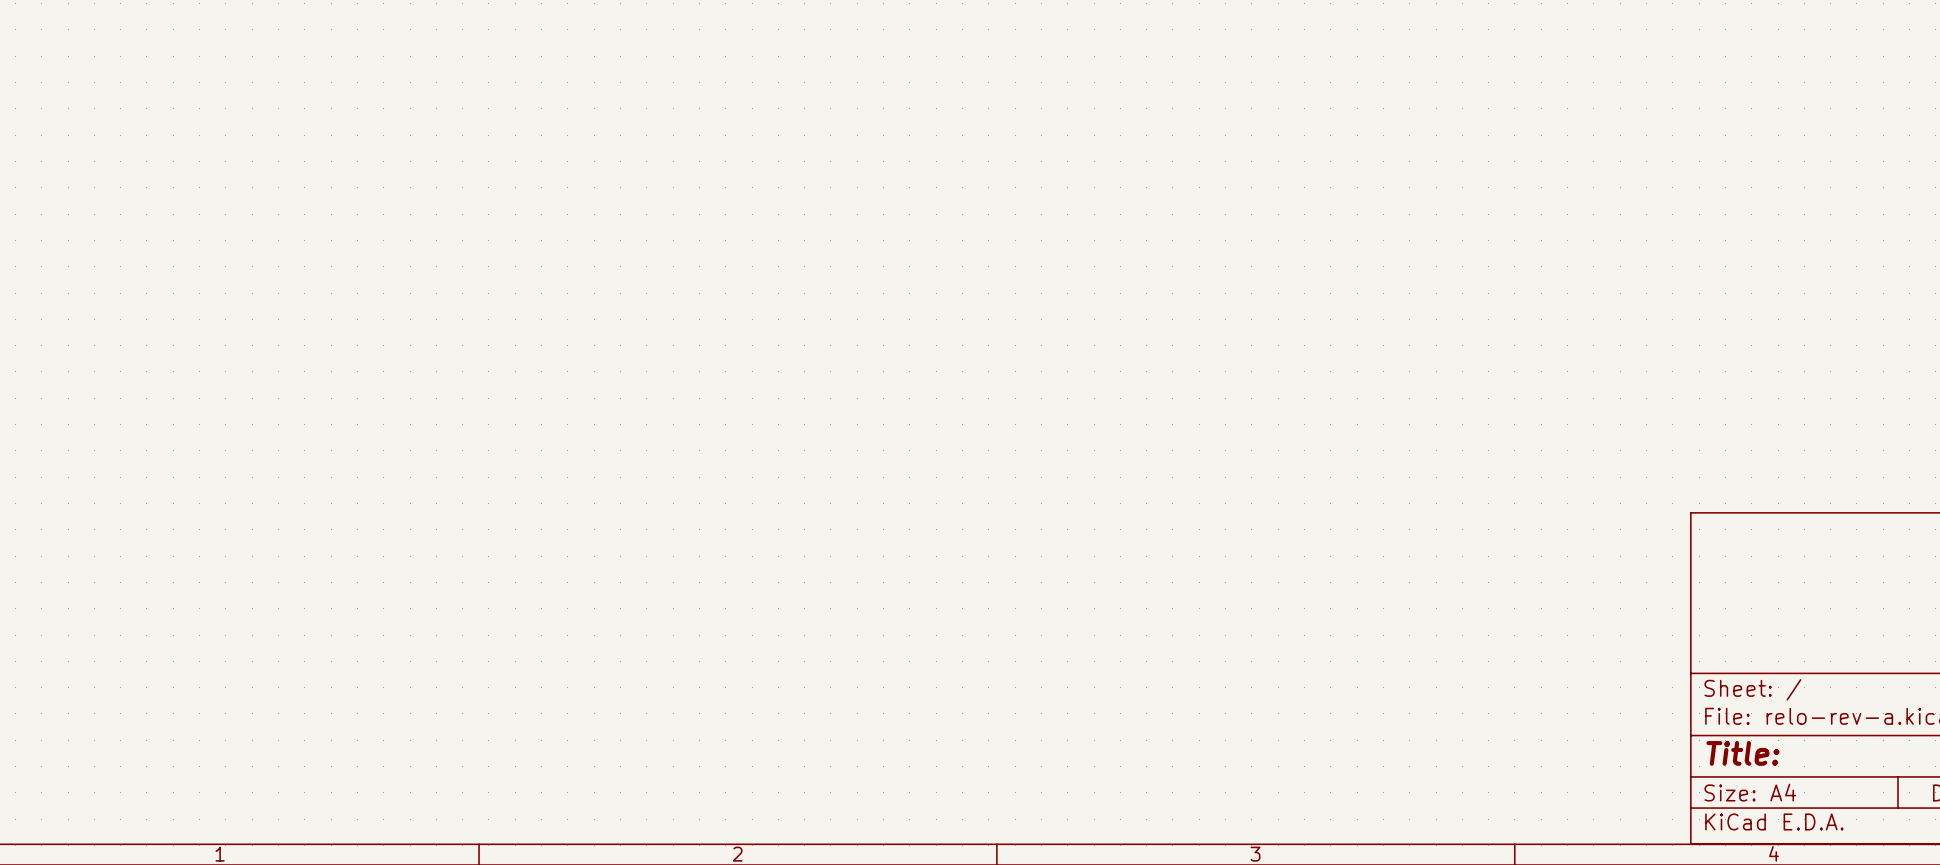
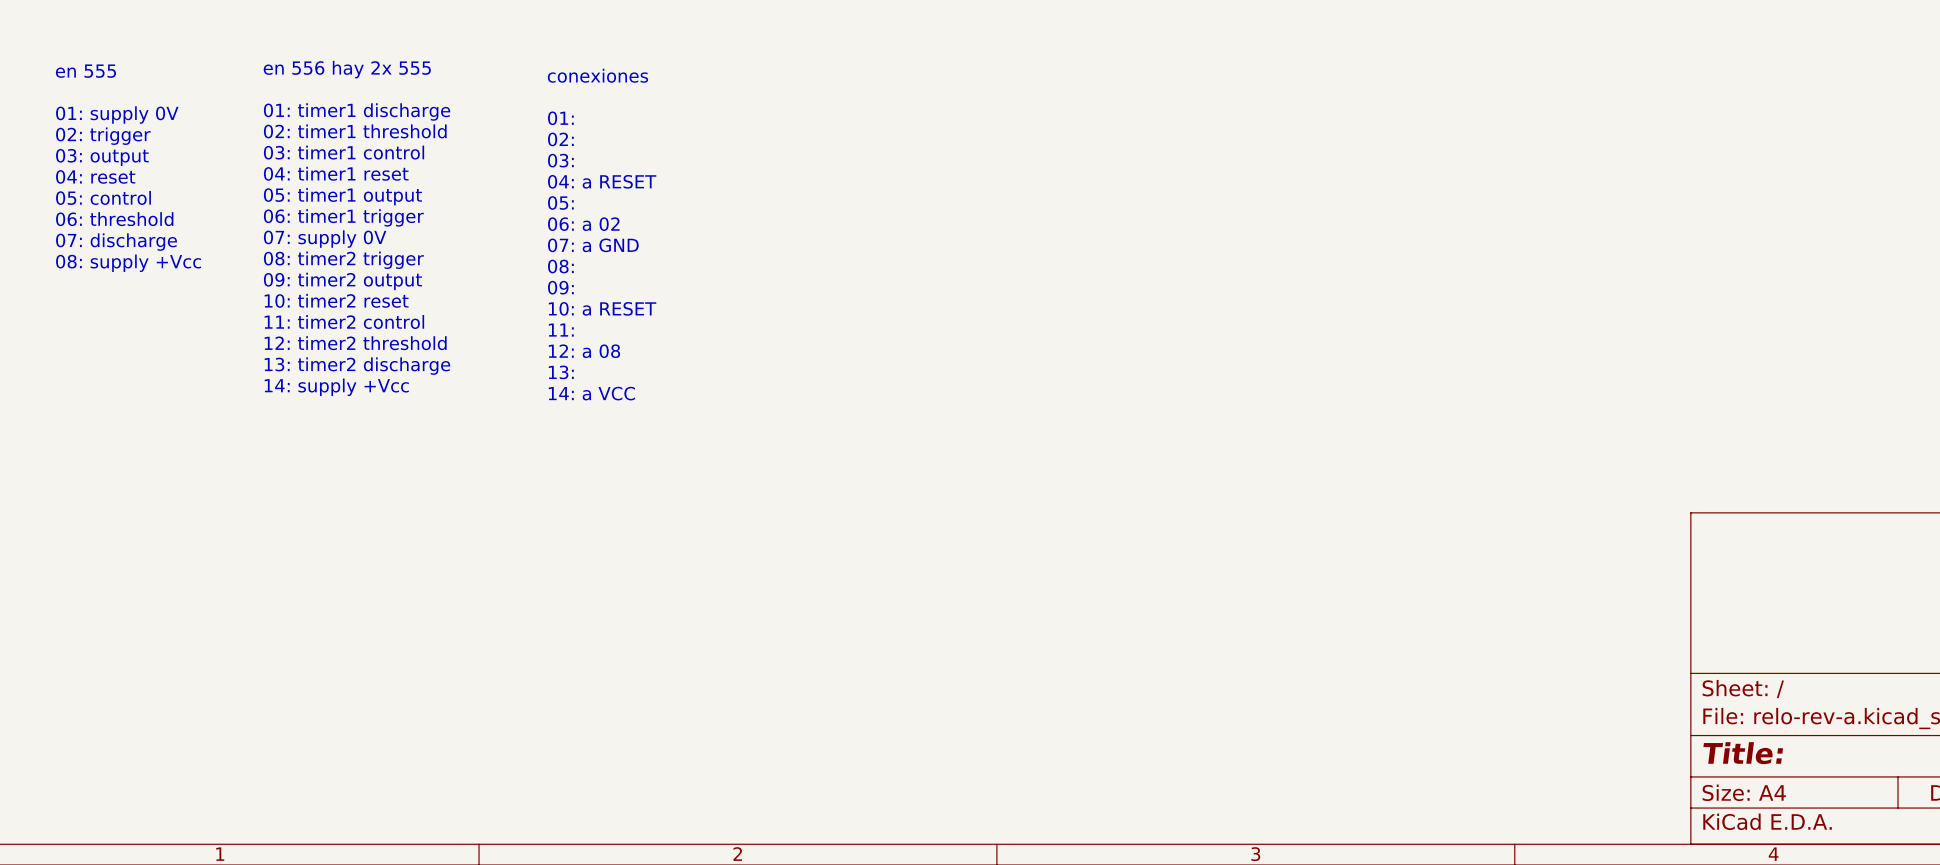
text: none -> en 556 hay 2x 555 (347, 69)
text: none -> en 555 (85, 71)
text: none -> conexiones (597, 75)
text: none -> 01: timer1 discharge (357, 111)
text: none -> 01: supply 0V (117, 115)
text: none -> 01: (560, 118)
text: none -> 02: timer1 threshold (355, 131)
text: none -> 02: trigger (103, 136)
text: none -> 02: (560, 139)
text: none -> 03: timer1 control (344, 152)
text: none -> 03: output (102, 157)
text: none -> 03: (560, 160)
text: none -> 04: timer1 reset (336, 173)
text: none -> 04: reset (95, 176)
text: none -> 04: a RESET (602, 181)
text: none -> 05: timer1 output (342, 196)
text: none -> 05: control (103, 197)
text: none -> 05: (560, 202)
text: none -> 06: timer1 trigger (343, 217)
text: none -> 06: threshold (114, 219)
text: none -> 06: a 02 (583, 224)
text: none -> 07: supply 0V (325, 239)
text: none -> 07: discharge (116, 242)
text: none -> 07: a GND (593, 245)
text: none -> 08: timer2 trigger (343, 260)
text: none -> 08: supply +Vcc (128, 263)
text: none -> 08: (560, 266)
text: none -> 09: timer2 output (342, 281)
text: none -> 09: (560, 287)
text: none -> 10: timer2 reset (336, 300)
text: none -> 10: a RESET (602, 308)
text: none -> 11: timer2 control (344, 322)
text: none -> 11: (561, 330)
text: none -> 12: timer2 threshold (355, 343)
text: none -> 12: a 08 (584, 351)
text: none -> 13: timer2 discharge (357, 366)
text: none -> 13: (561, 372)
text: none -> 14: supply +Vcc (336, 387)
text: none -> 14: a VCC (591, 393)

